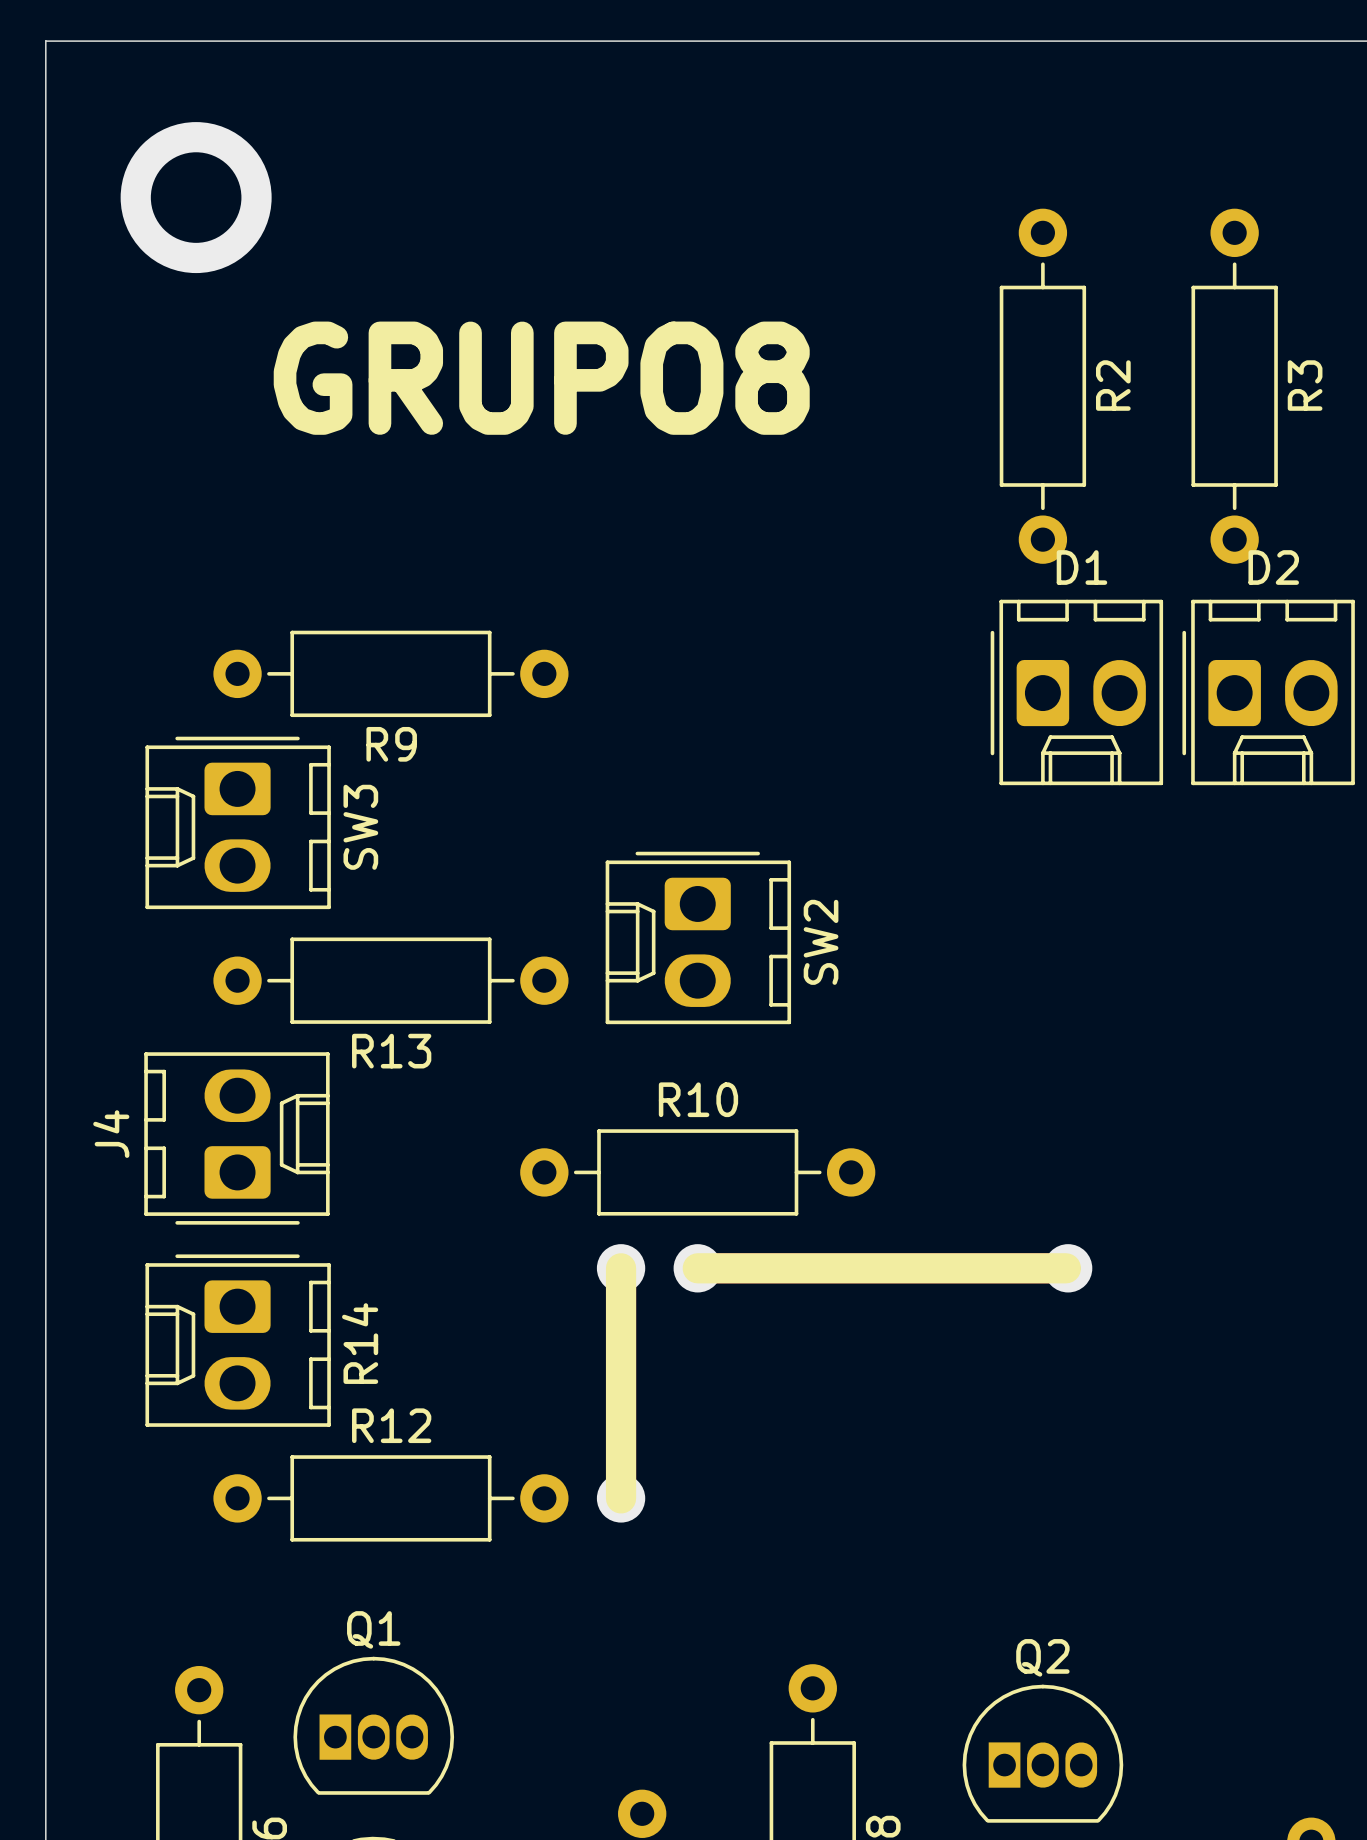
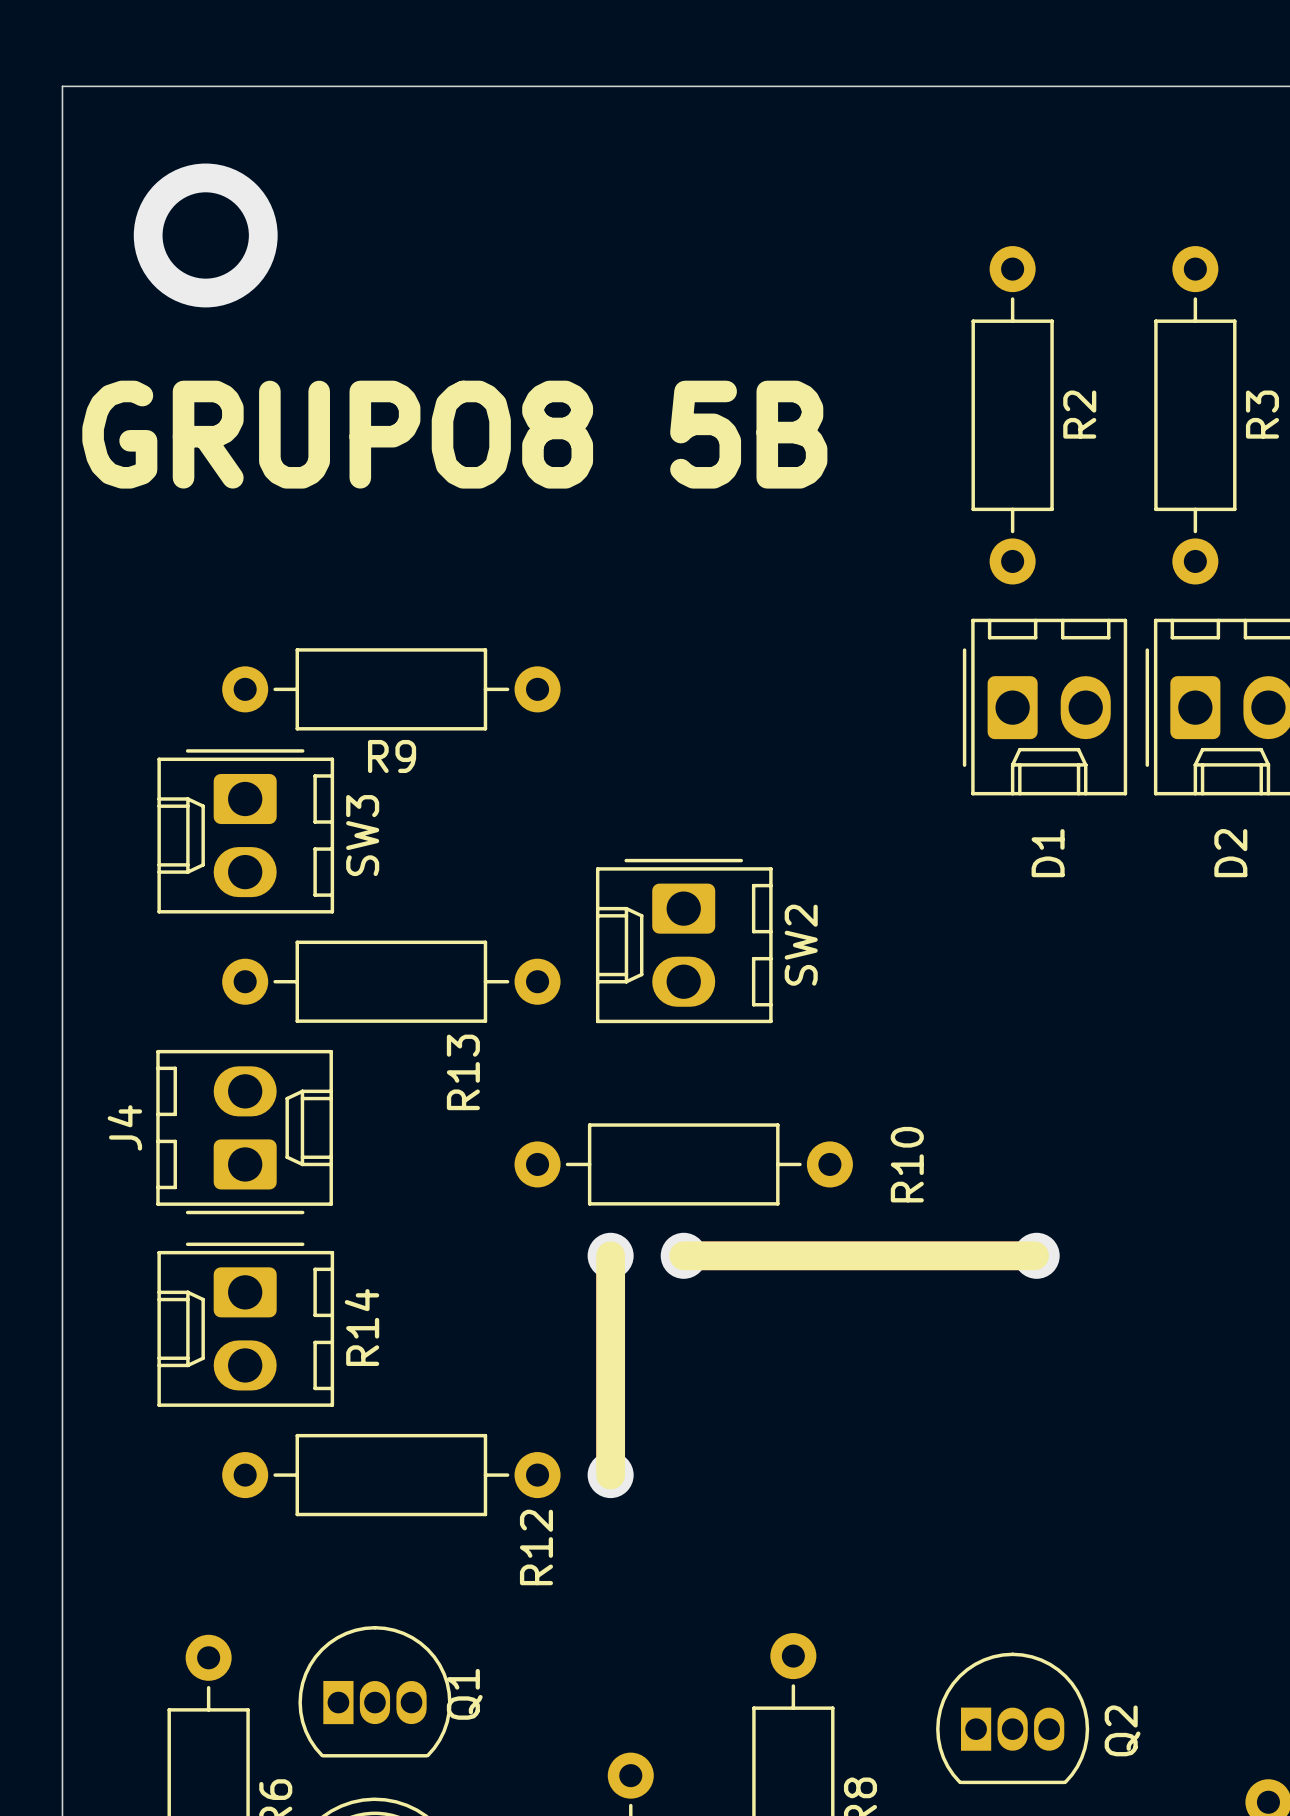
text: GRUPO8 (541, 378) -> GRUPO8 5B (454, 434)
D1 name rotation: 0° (1081, 567) -> 90° counterclockwise (1048, 853)
D1 name position: D1 (1081, 567) -> D1 (1048, 853)
D2 name rotation: 0° (1273, 567) -> 90° counterclockwise (1230, 853)
D2 name position: D2 (1273, 567) -> D2 (1230, 853)
R13 name rotation: 0° (391, 1051) -> 90° counterclockwise (463, 1072)
R10 name rotation: 0° (698, 1099) -> 90° counterclockwise (907, 1164)
R10 name position: R10 (698, 1099) -> R10 (907, 1164)
R12 name rotation: 0° (391, 1425) -> 90° counterclockwise (536, 1547)
R12 name position: R12 (391, 1425) -> R12 (536, 1547)
Q1 name rotation: 0° (373, 1629) -> 90° counterclockwise (464, 1694)
Q1 name position: Q1 (373, 1629) -> Q1 (464, 1694)
Q2 name rotation: 0° (1042, 1657) -> 90° counterclockwise (1122, 1730)
Q2 name position: Q2 (1042, 1657) -> Q2 (1122, 1730)

